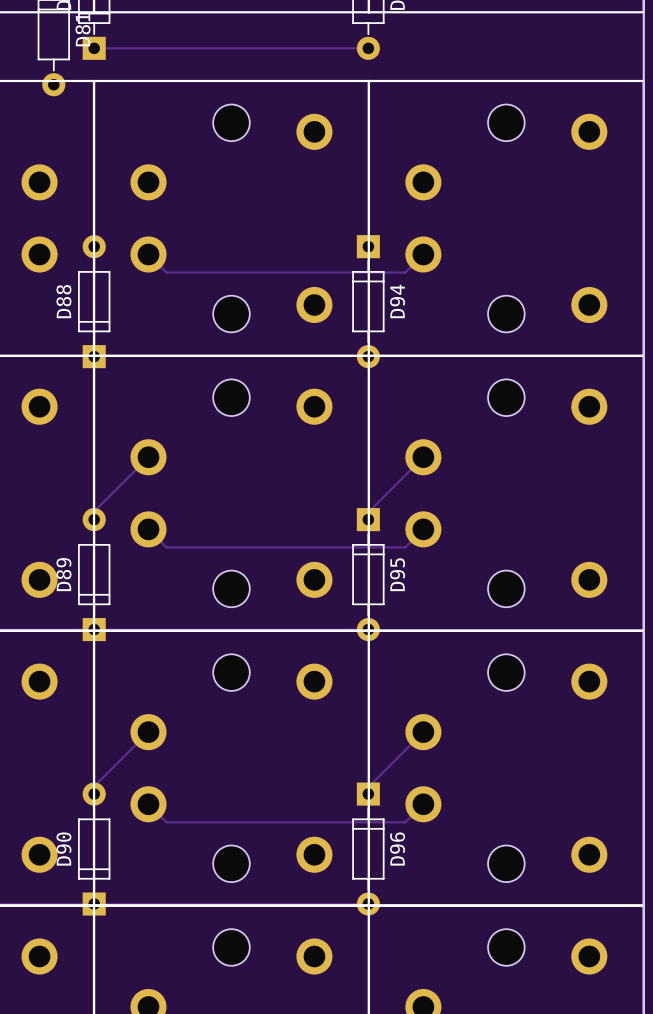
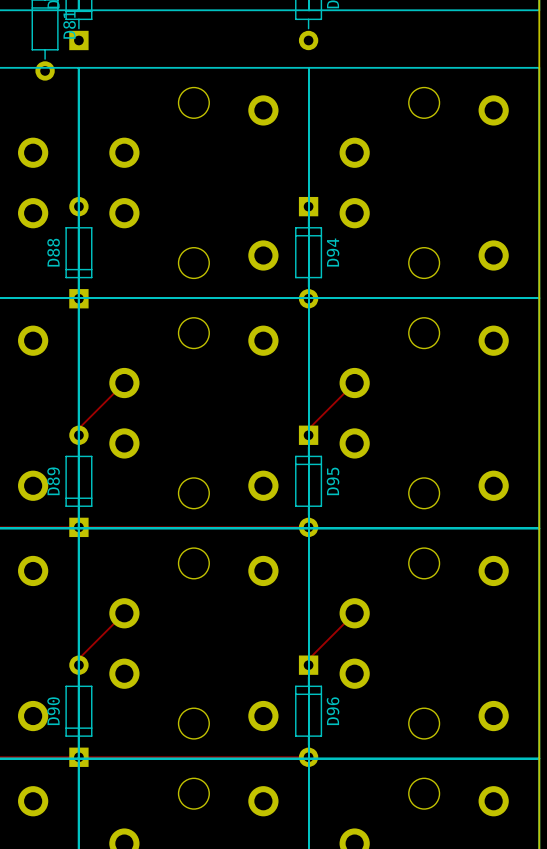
track: (94, 48) (368, 48) -> none
track: (148, 254) (166, 272) (405, 272) (423, 254) -> none
track: (148, 529) (166, 547) (405, 547) (423, 529) -> none
track: (148, 804) (166, 822) (405, 822) (423, 804) -> none

